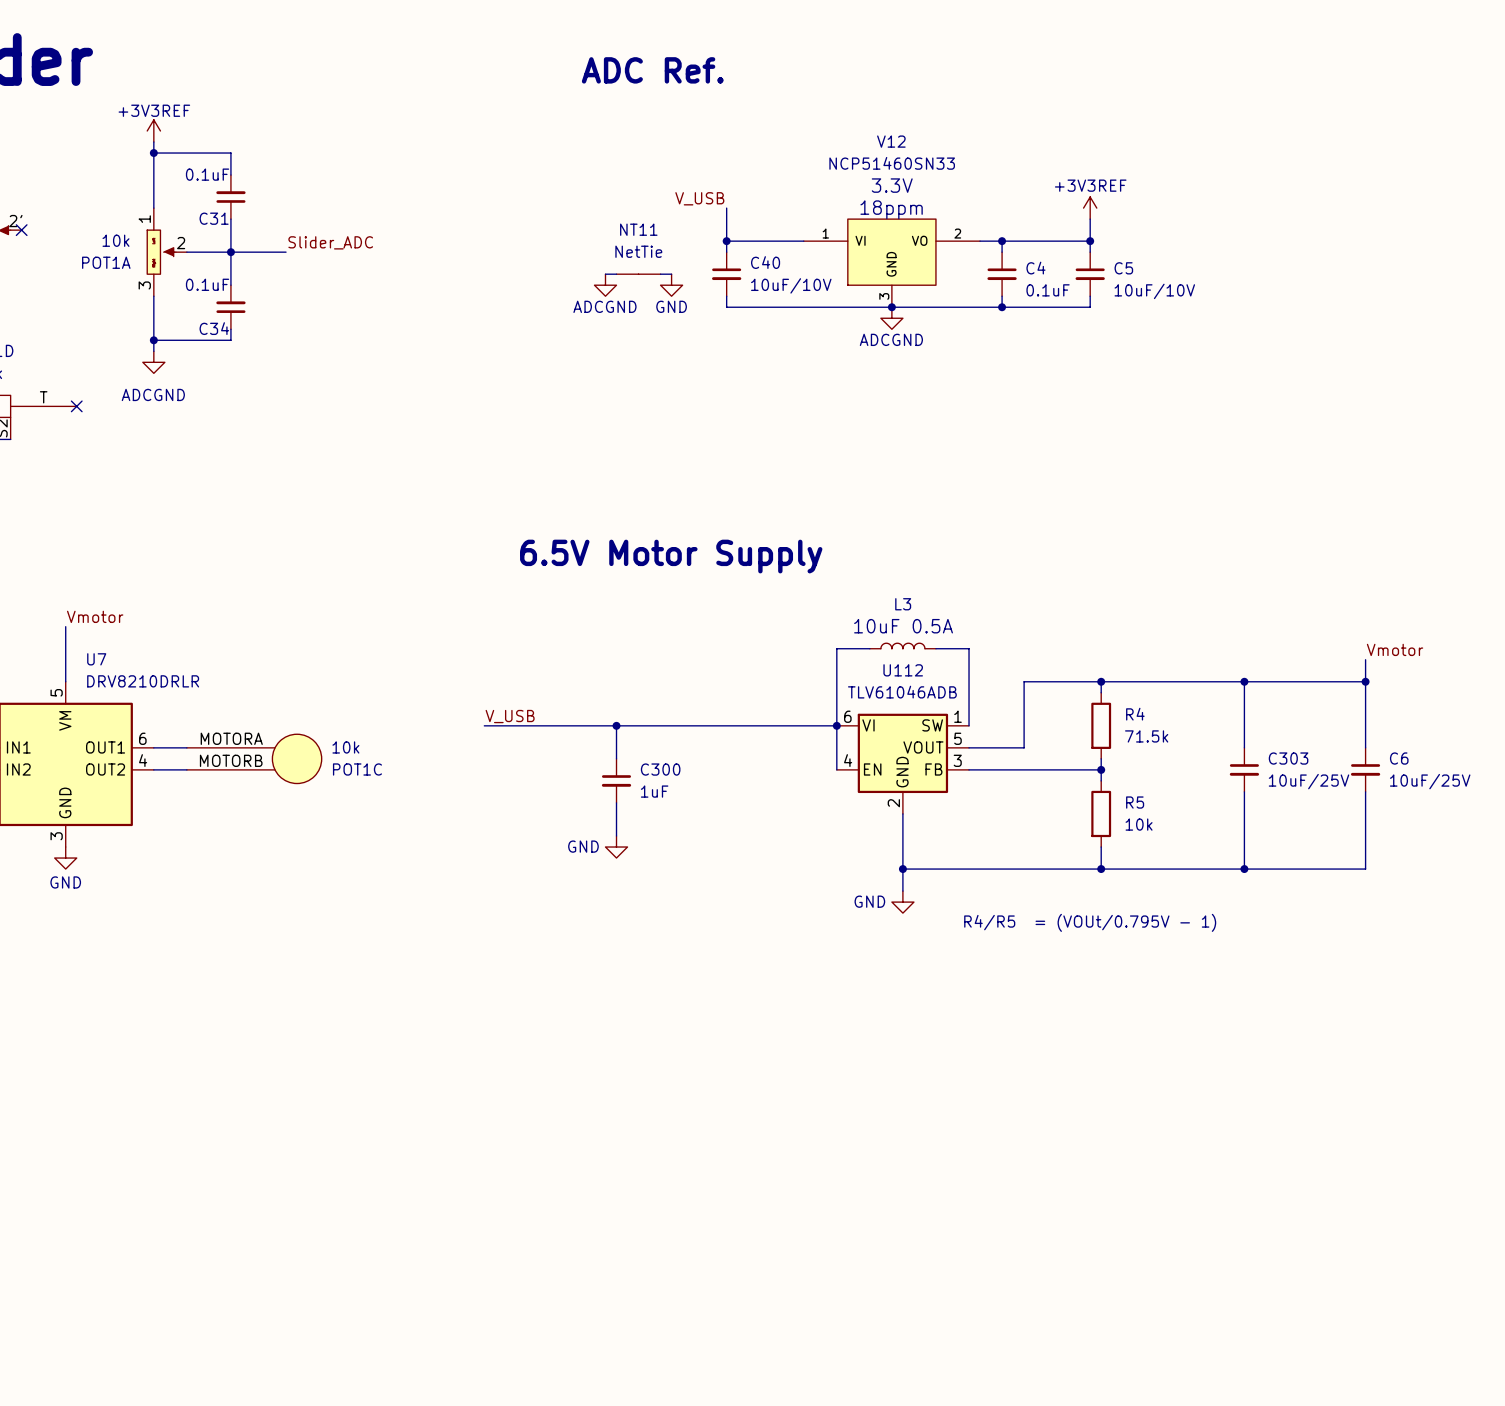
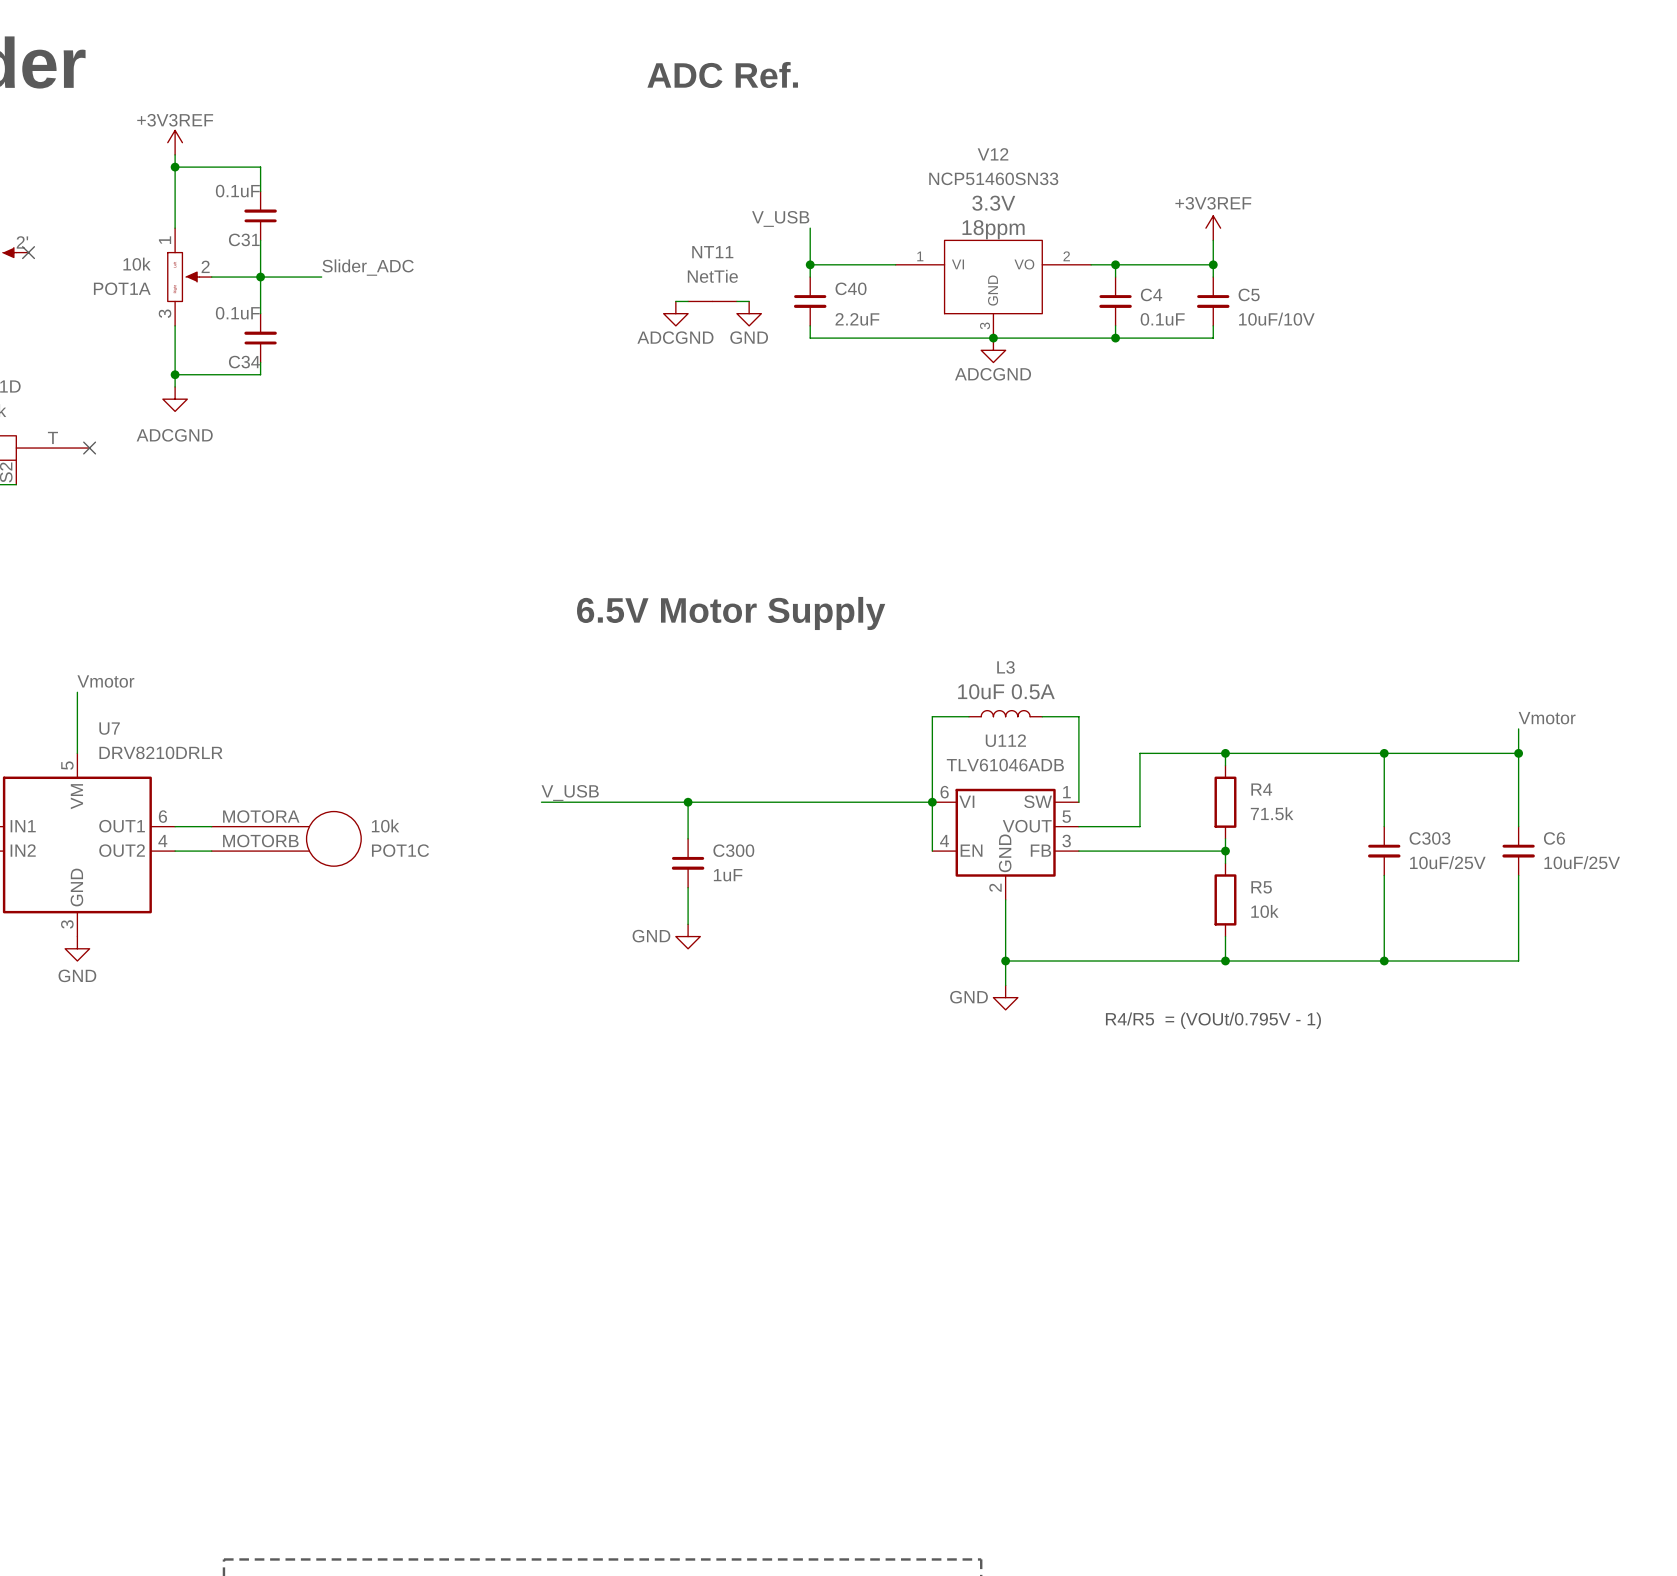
C40 text: 10uF/10V (791, 285) -> 2.2uF (857, 319)

